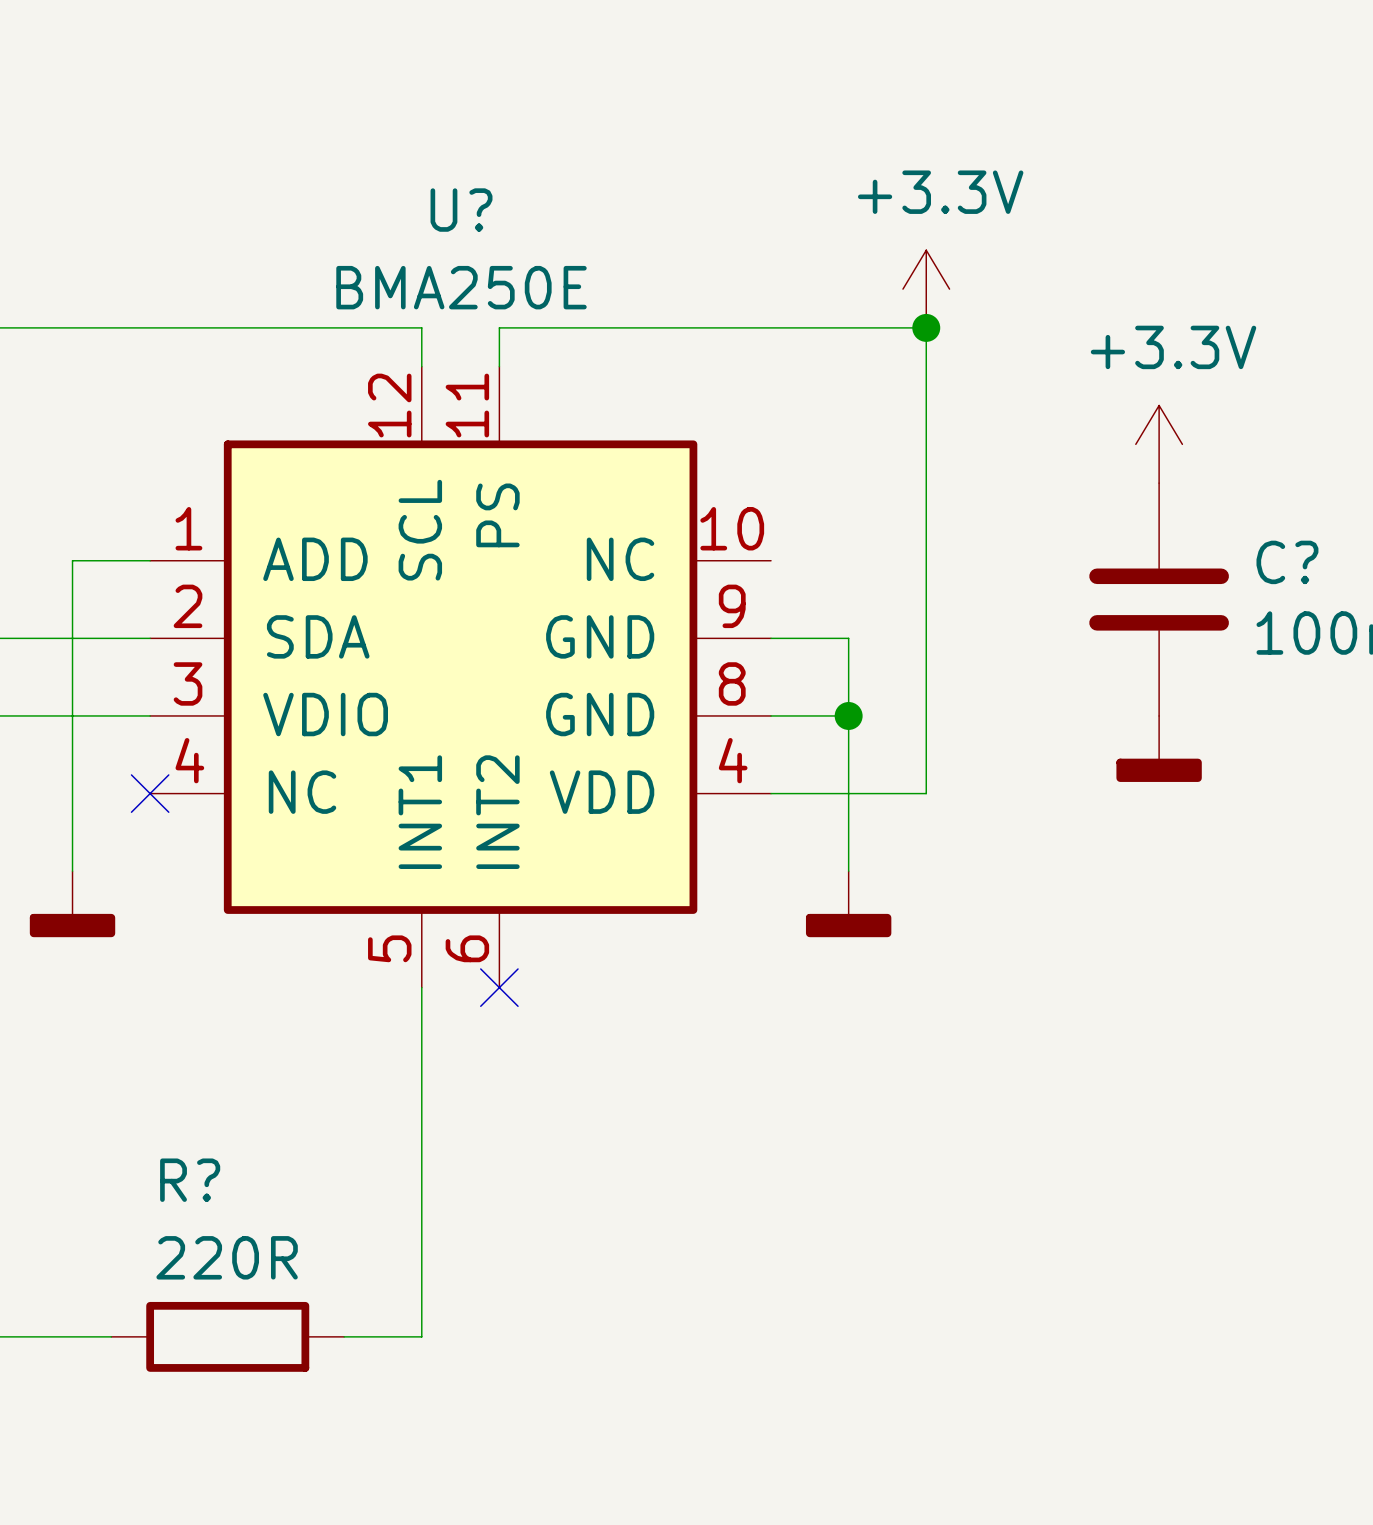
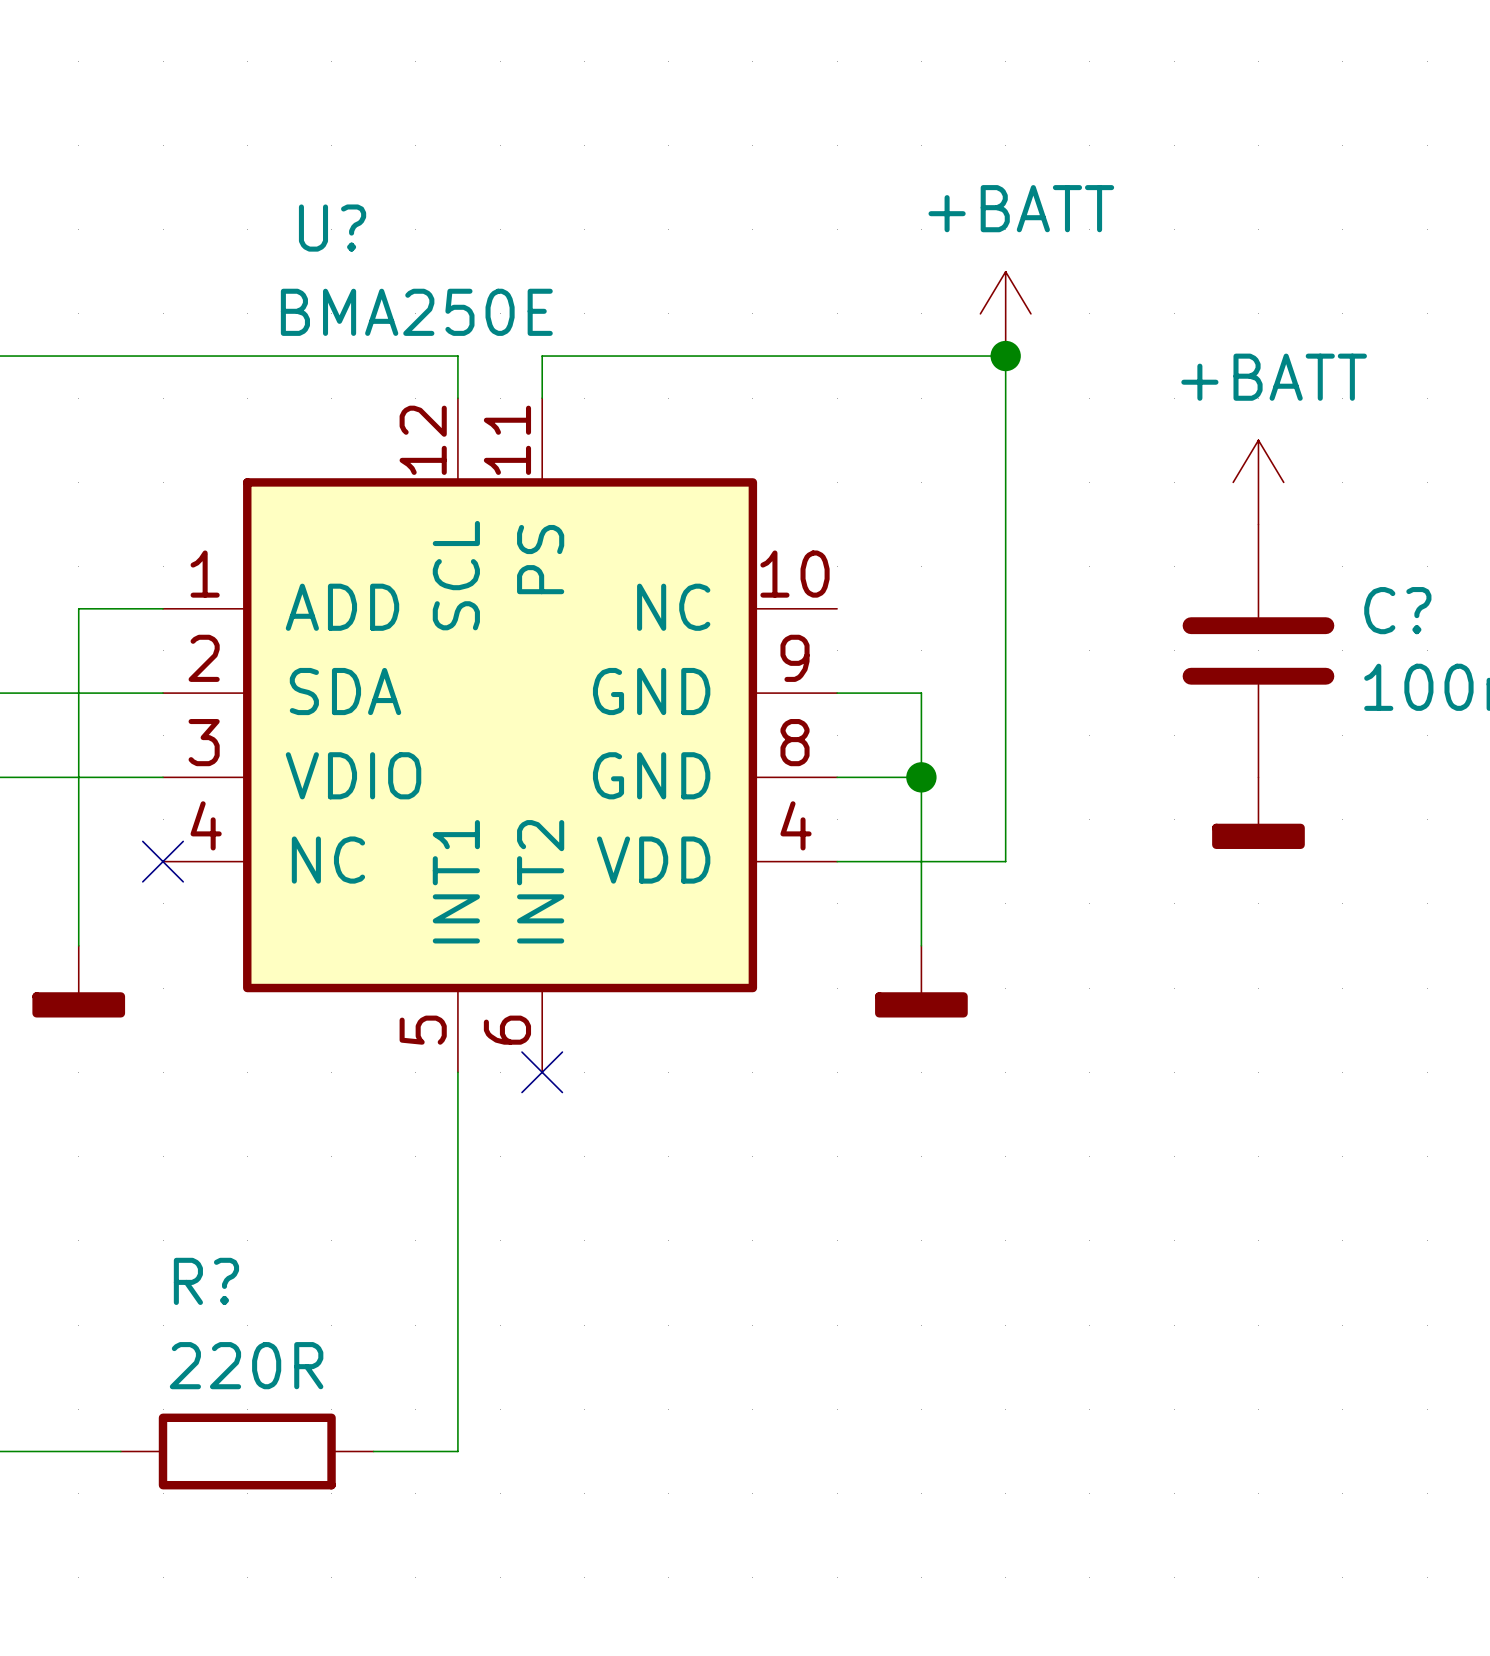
U? name position: U? (461, 210) -> U? (332, 228)
U? text position: BMA250E (461, 287) -> BMA250E (416, 312)
power symbol: +3.3V (926, 289) -> +BATT (1005, 313)
power symbol: +3.3V (1159, 444) -> +BATT (1258, 482)

